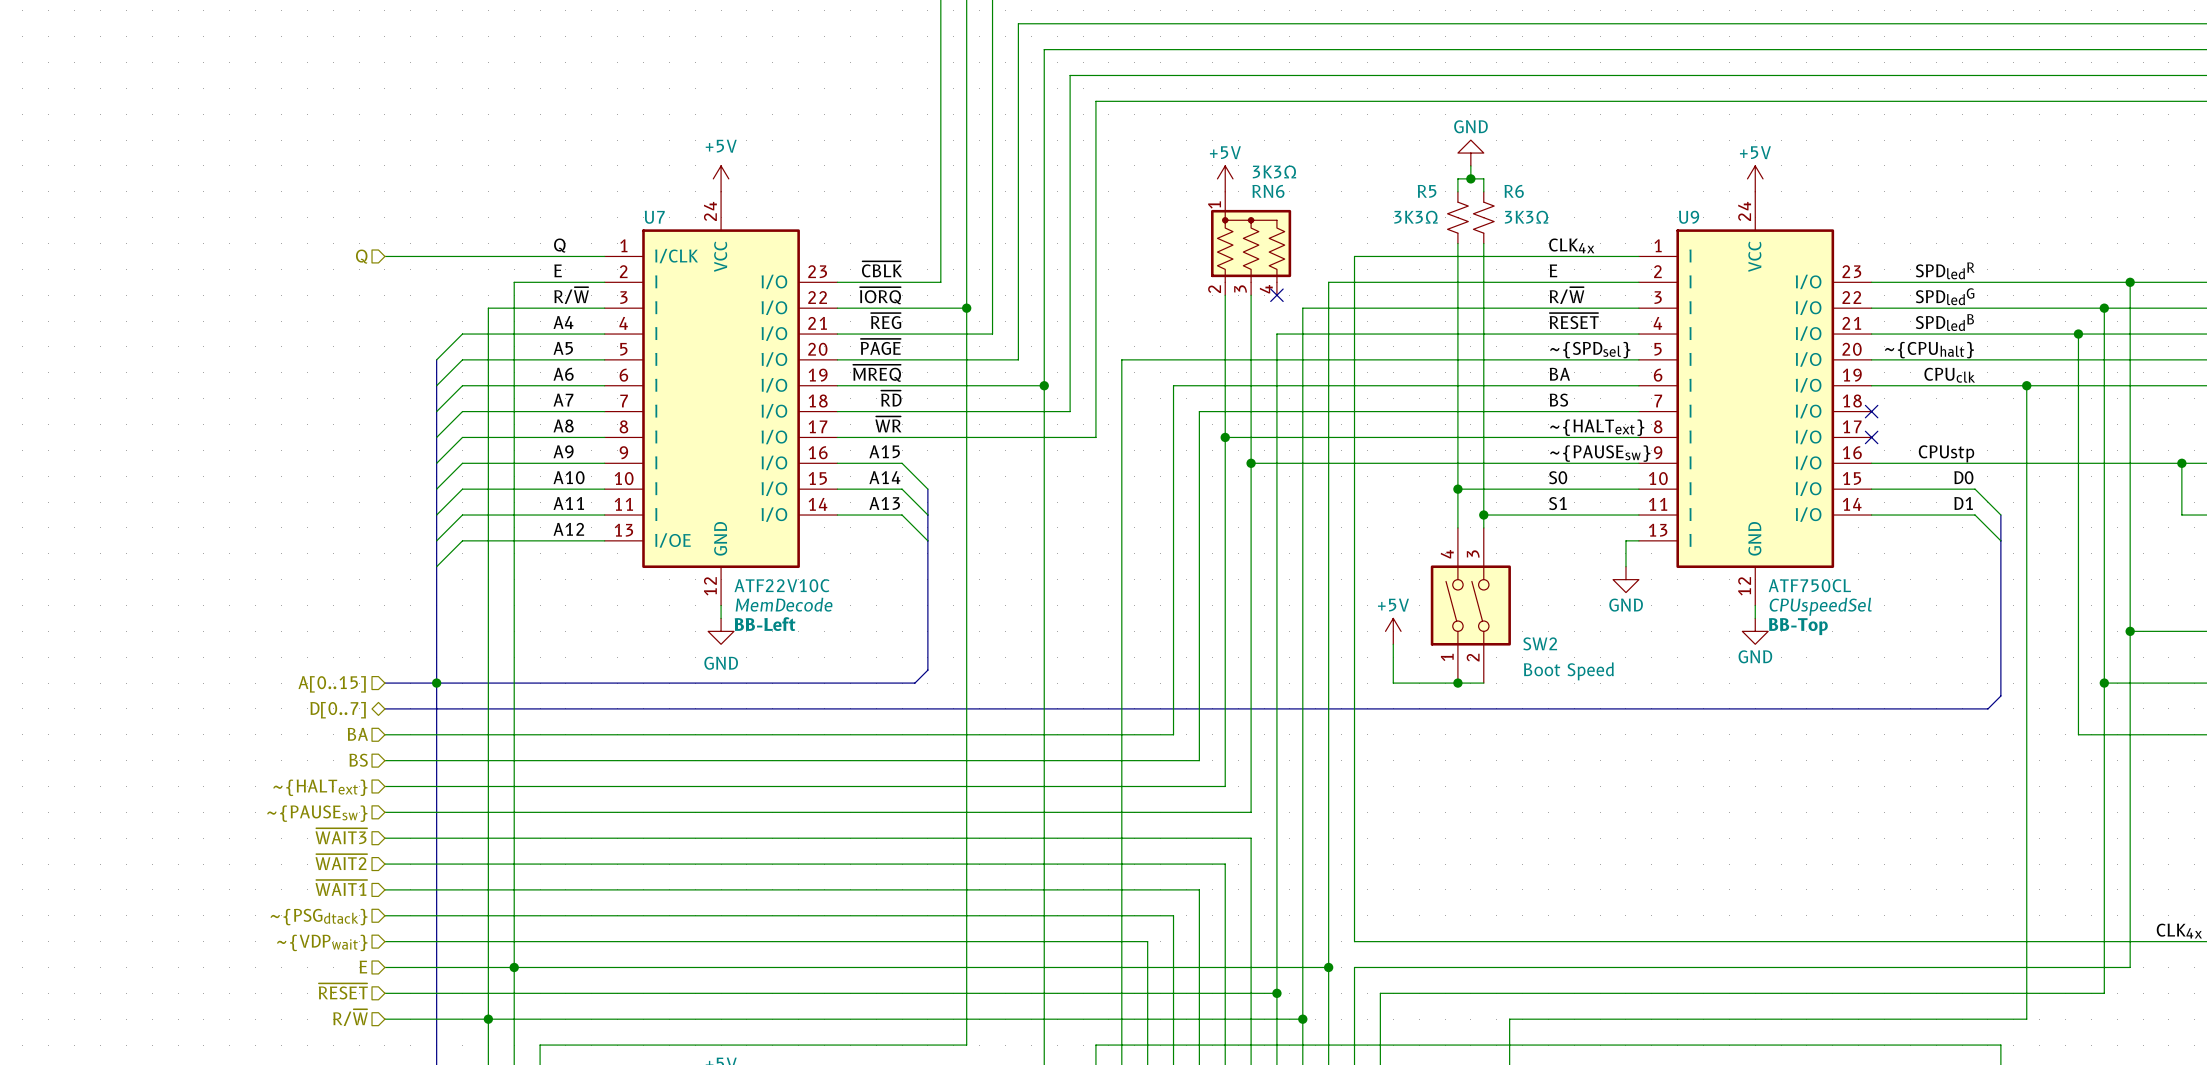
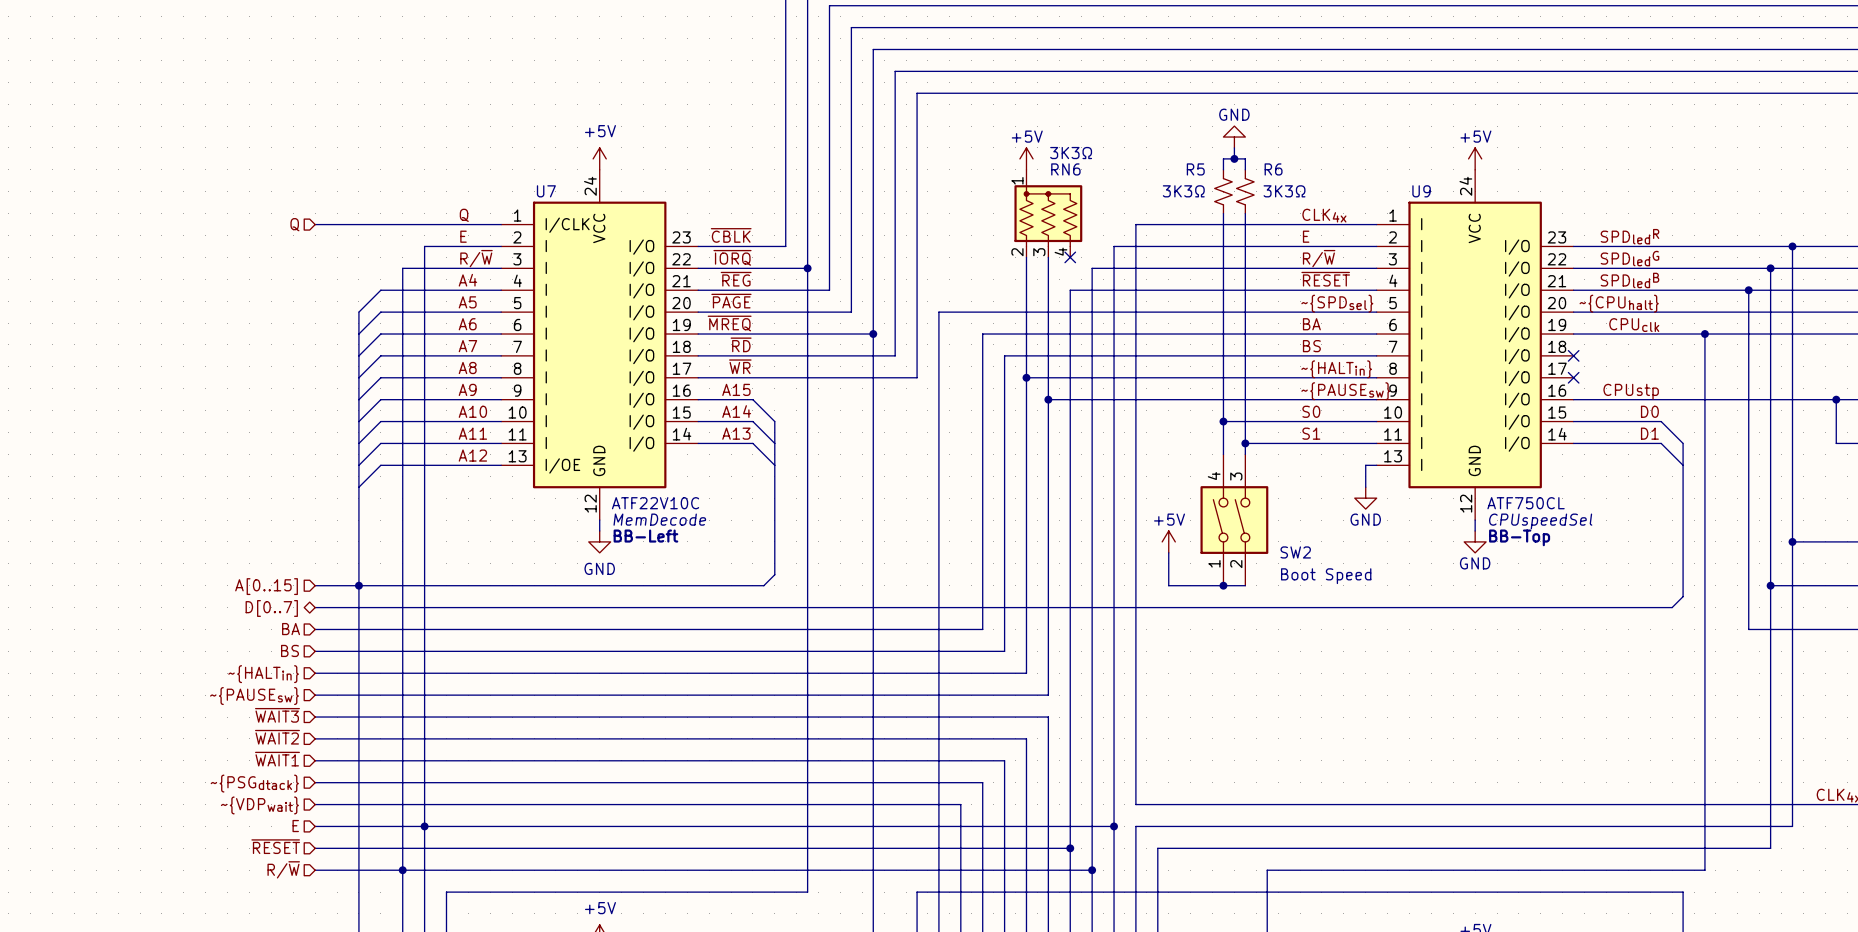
label: ~{HALText} (1597, 427) -> ~{HALTin} (1336, 369)
hierarchical label: ~{HALText} (320, 787) -> ~{HALTin} (263, 674)

